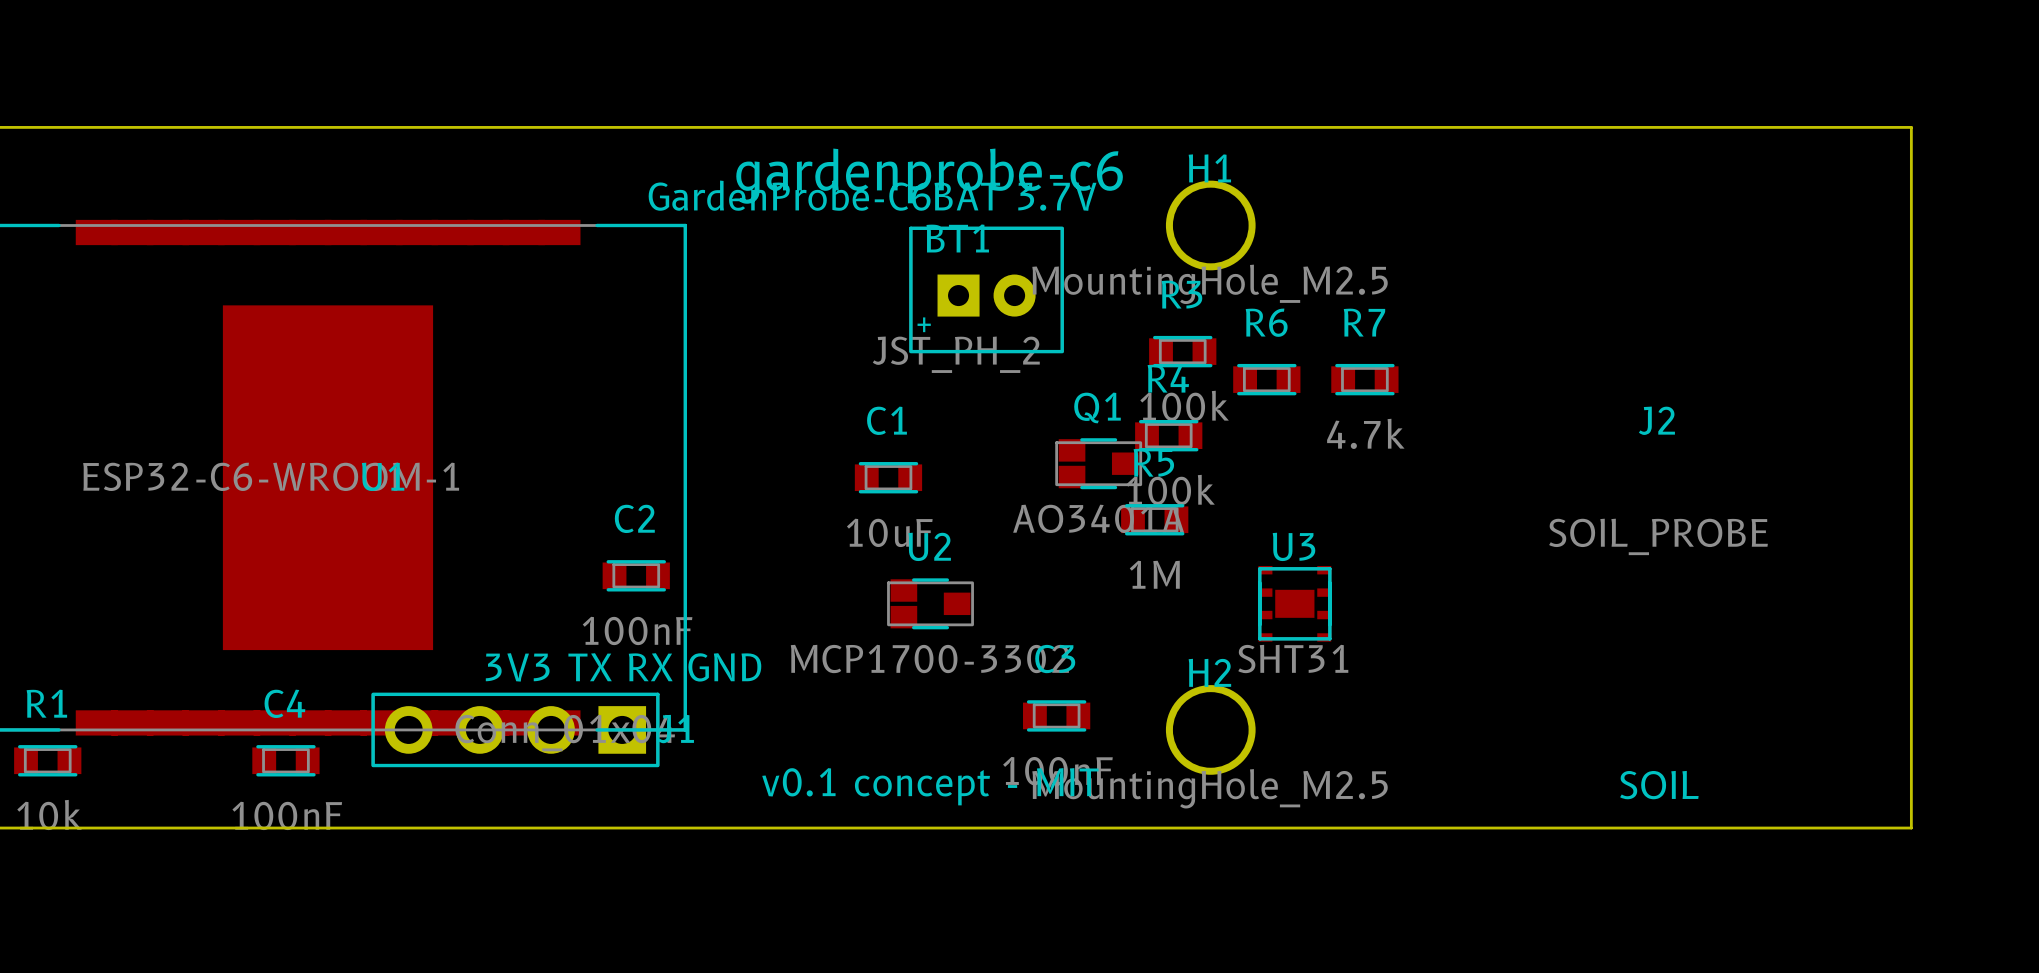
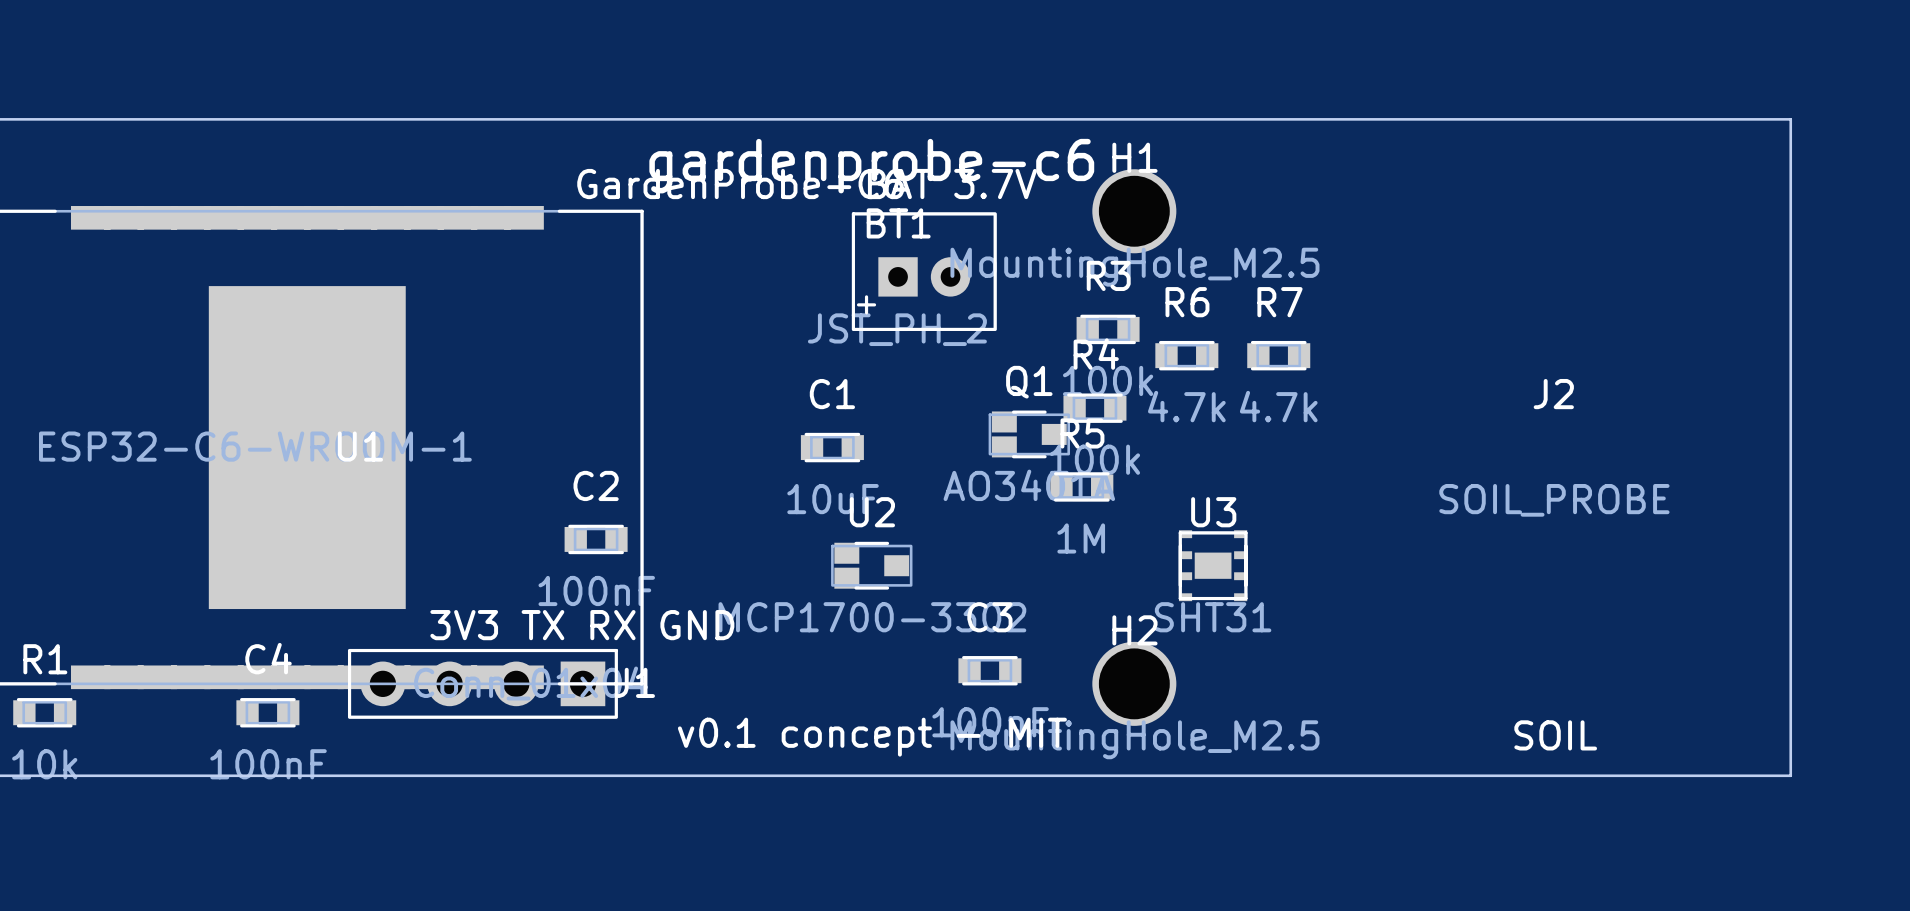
R6 value: none -> 4.7k (1186, 406)

